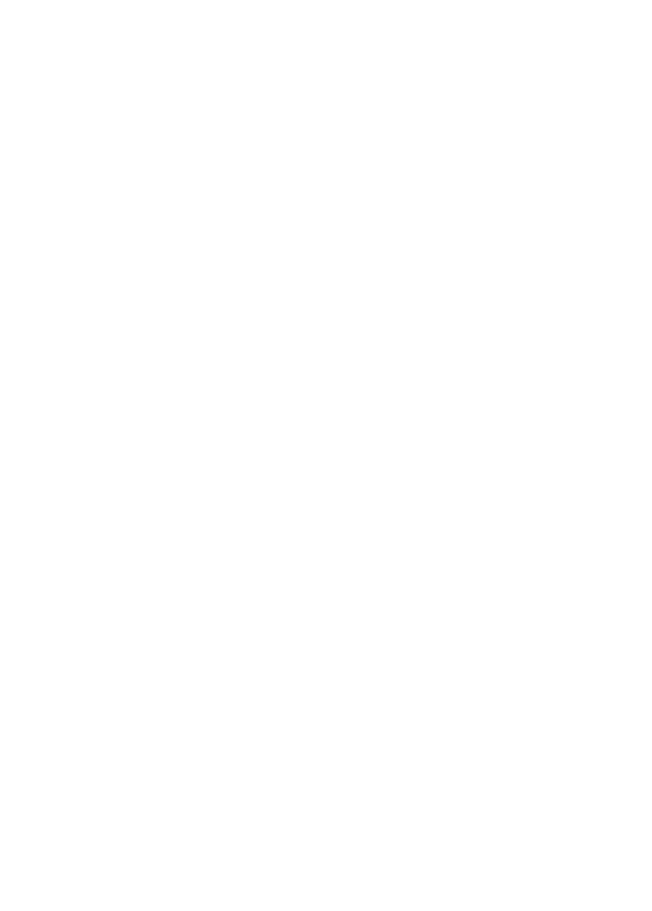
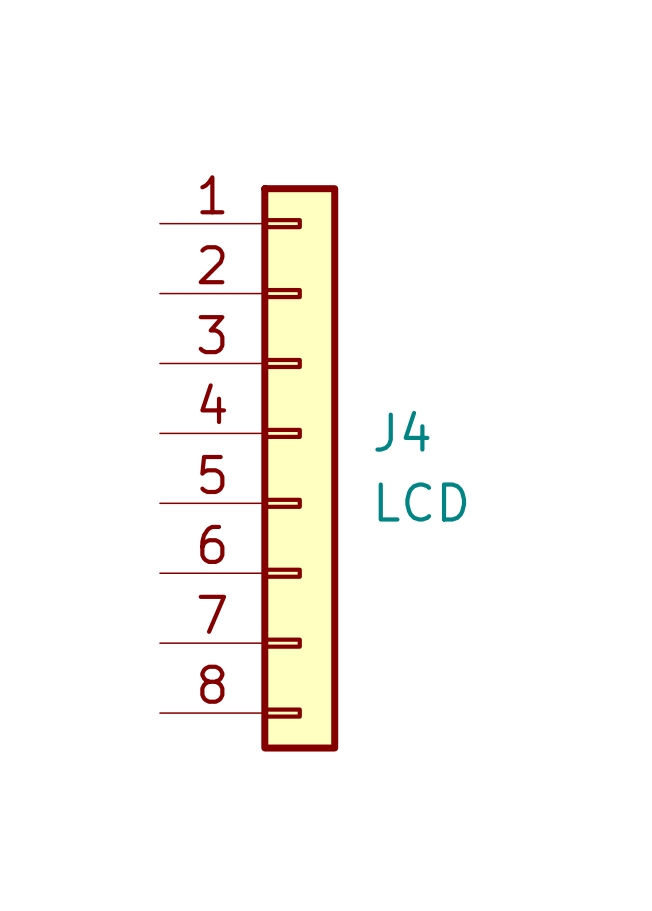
J4: none -> LCD (249, 468)

